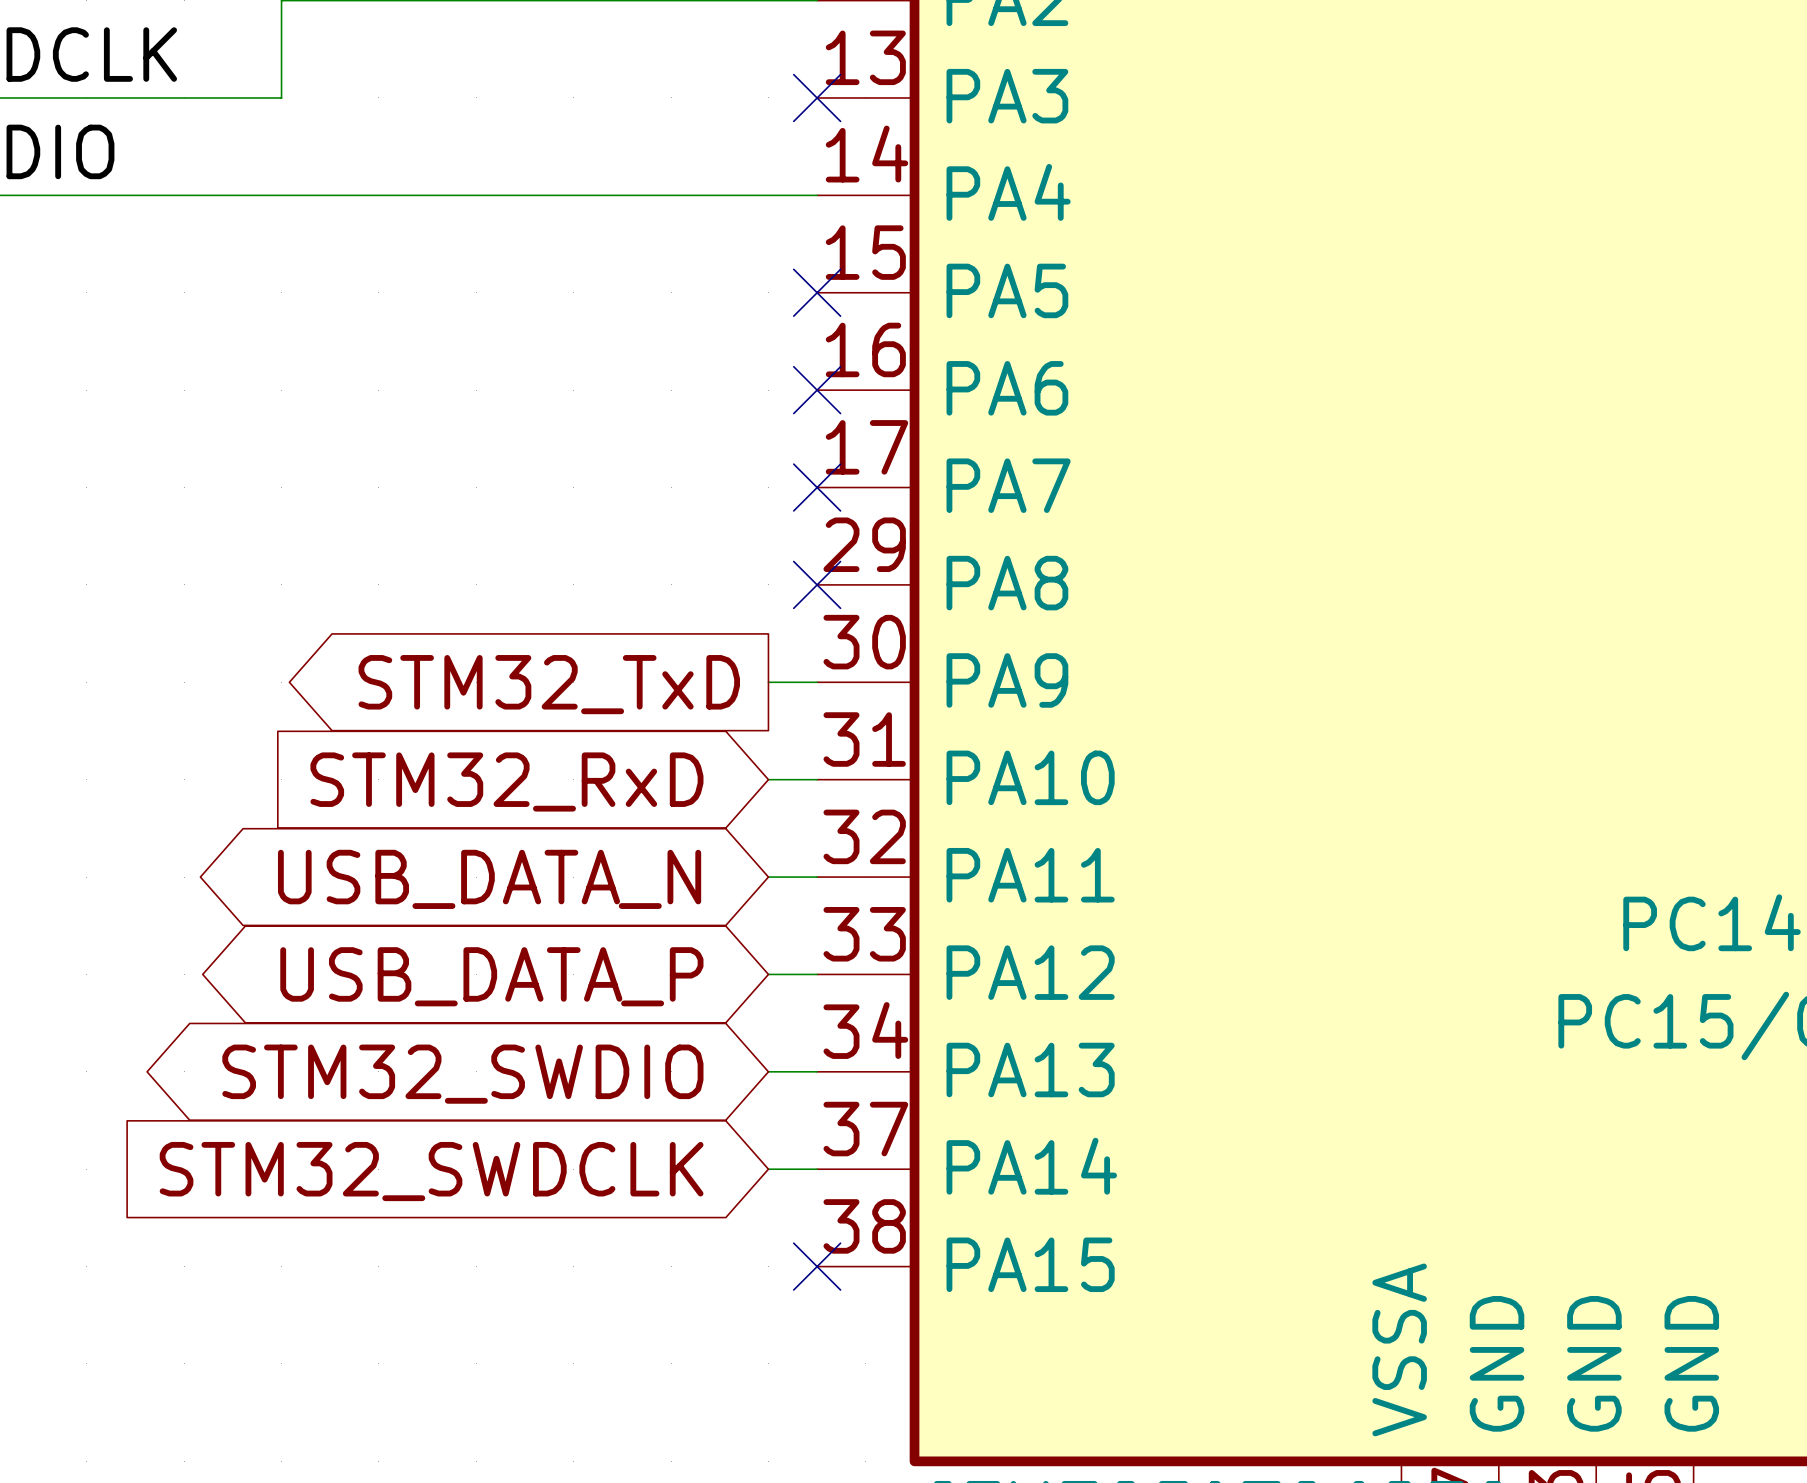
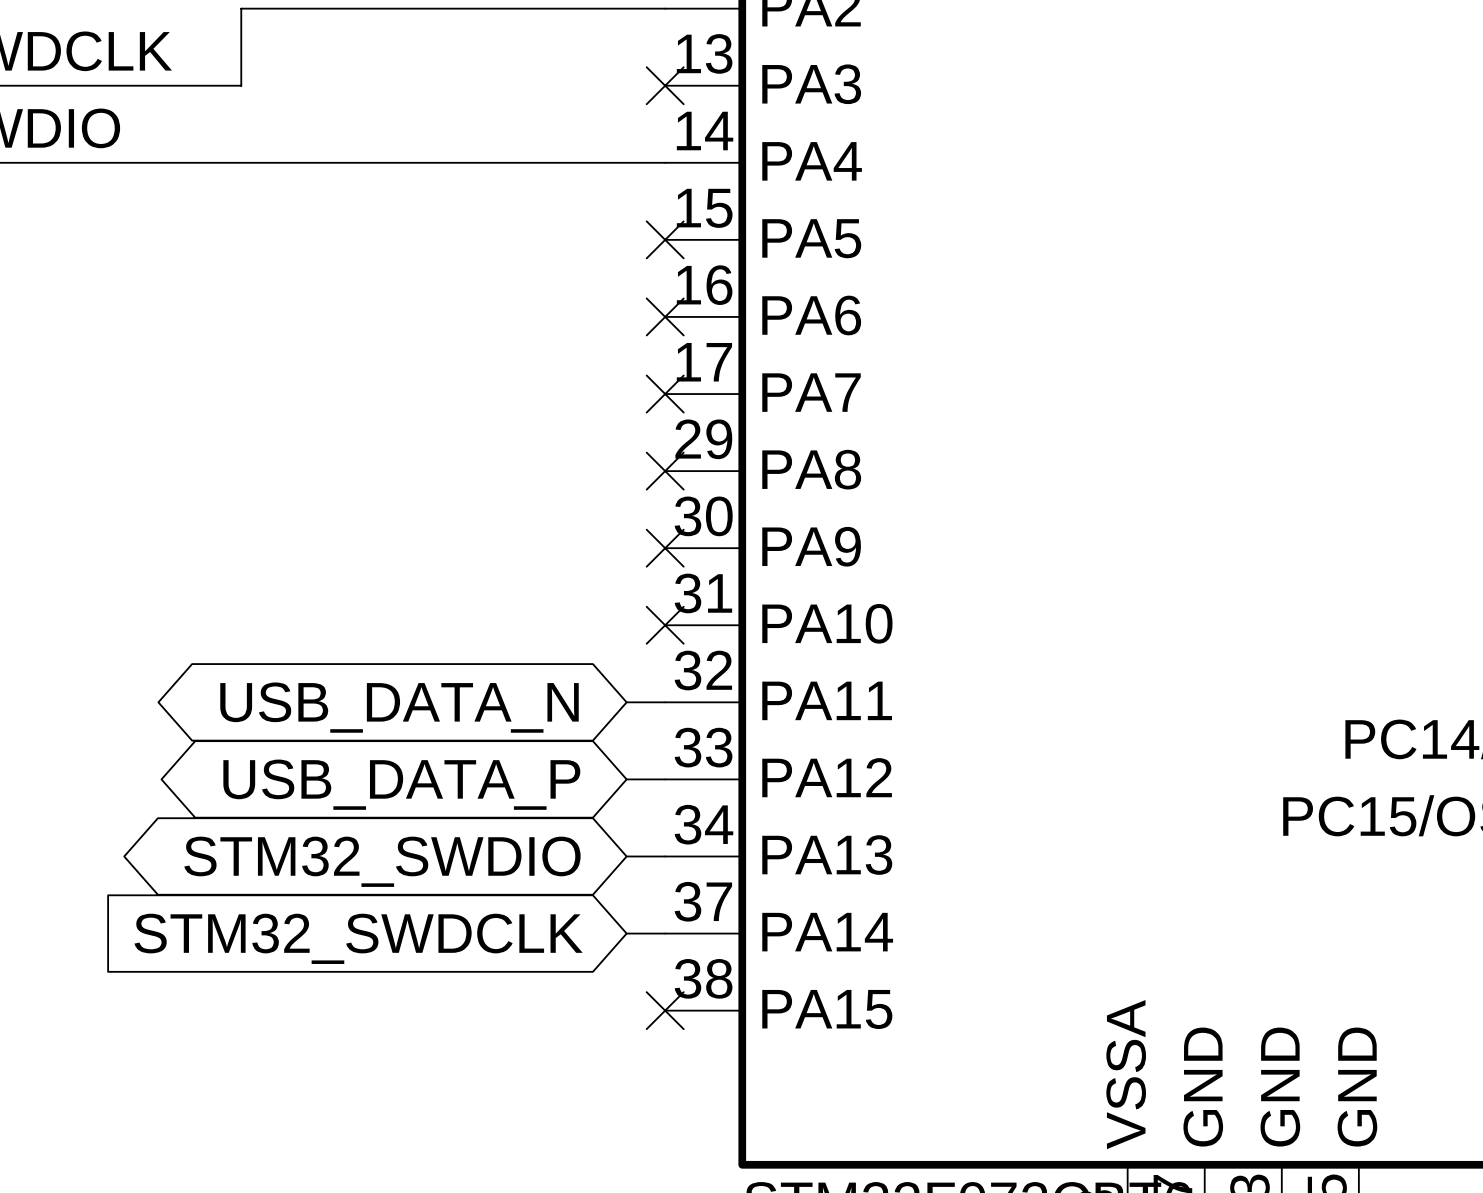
wire: (768, 682) (817, 682) -> none
no-connect mark: none -> (665, 548)
global label: STM32_TxD (549, 684) -> none
wire: (768, 779) (817, 779) -> none
no-connect mark: none -> (665, 625)
global label: STM32_RxD (506, 781) -> none

